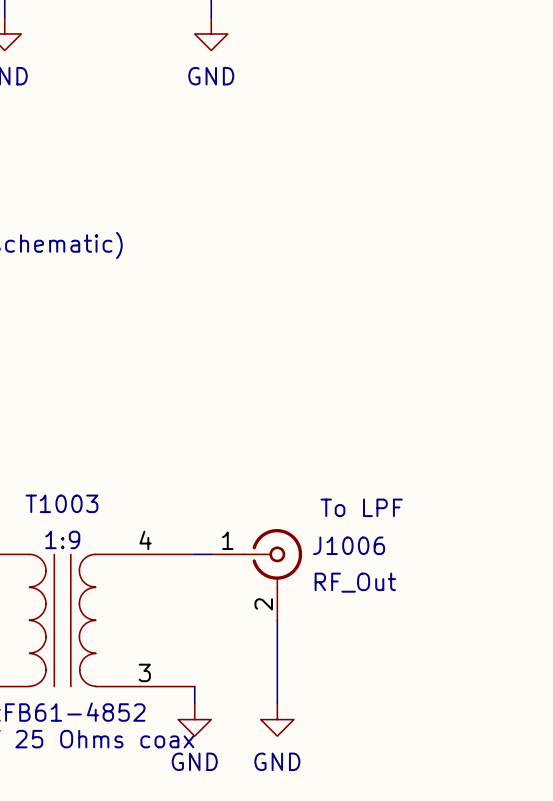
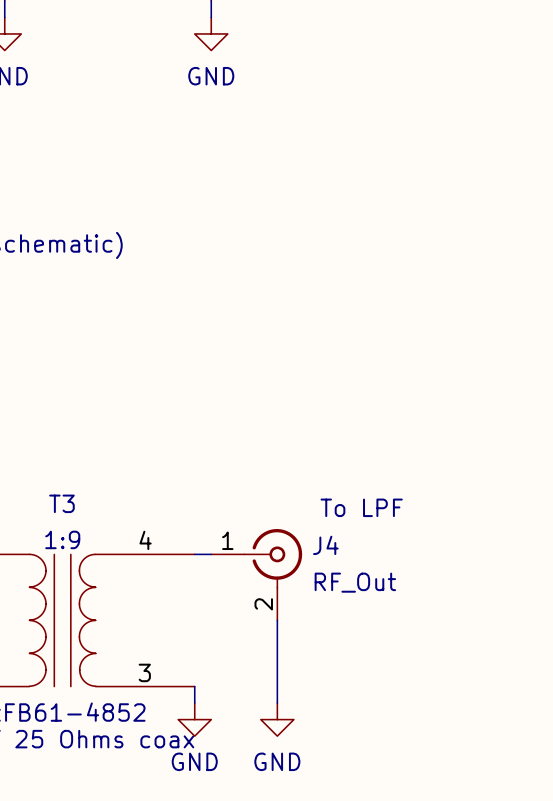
T1003 name: T1003 (61, 503) -> T3 (61, 503)
J1006 name: J1006 (349, 545) -> J4 (325, 545)

